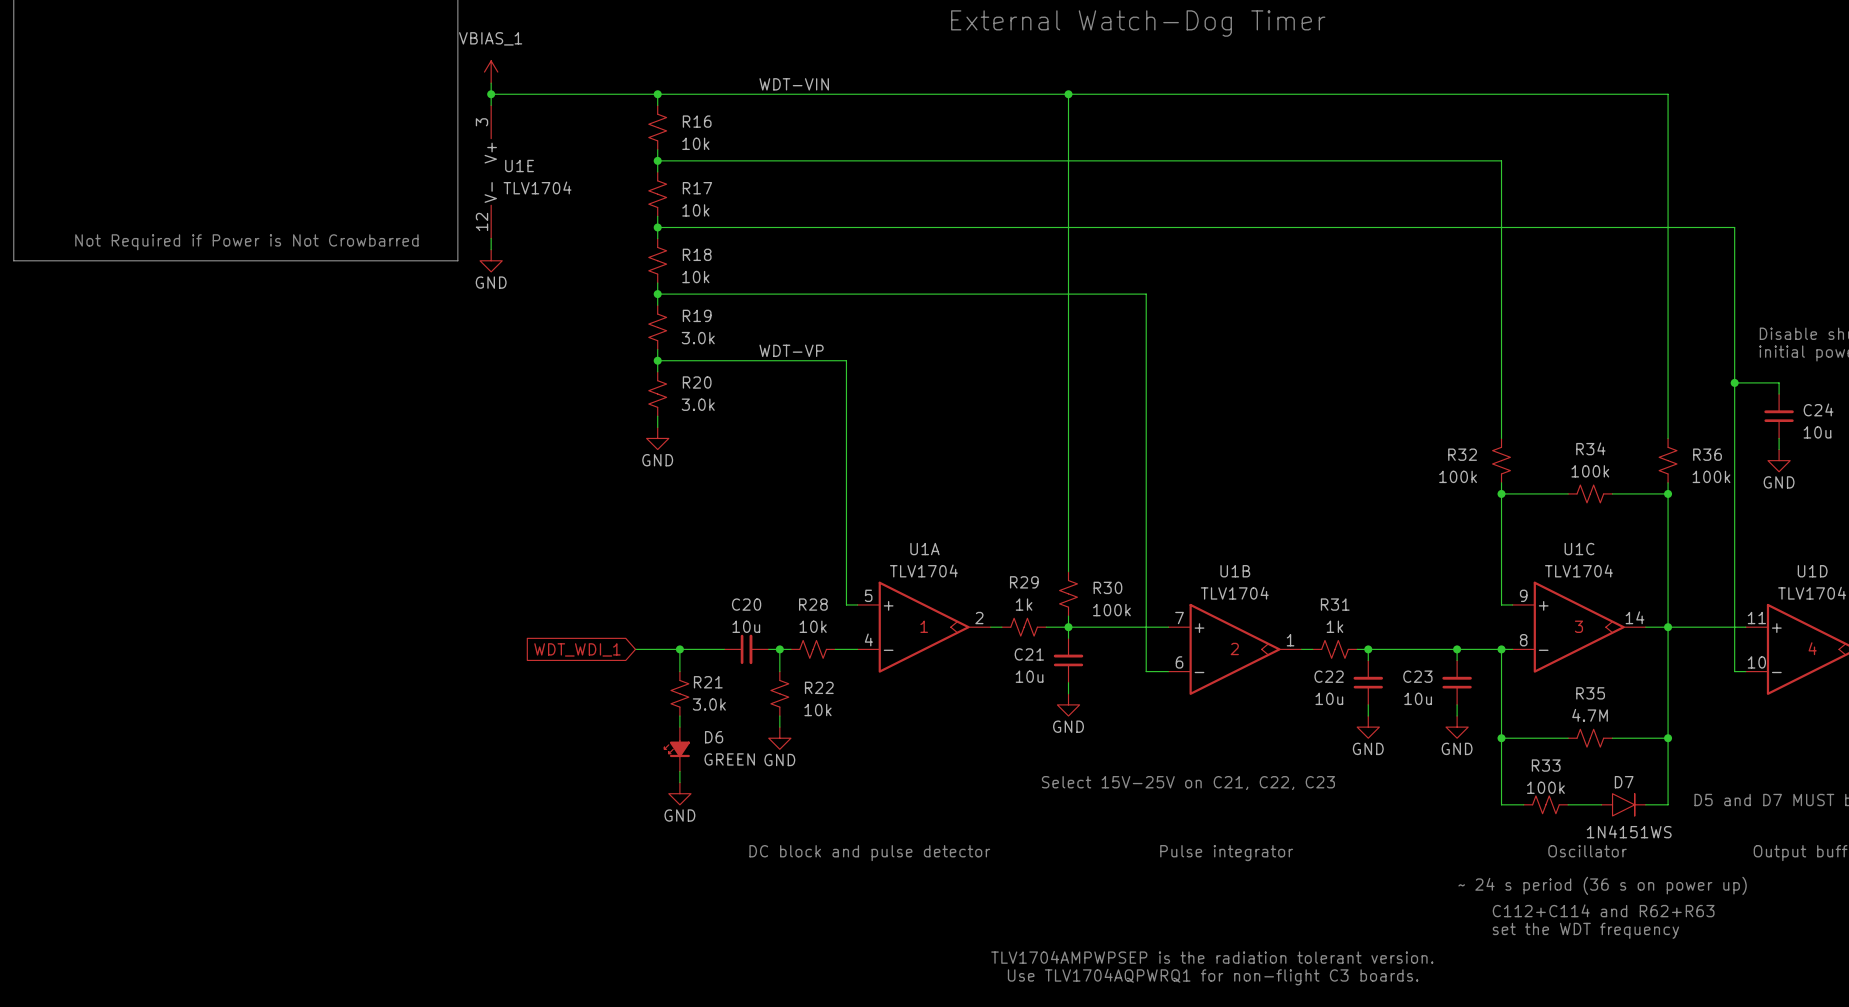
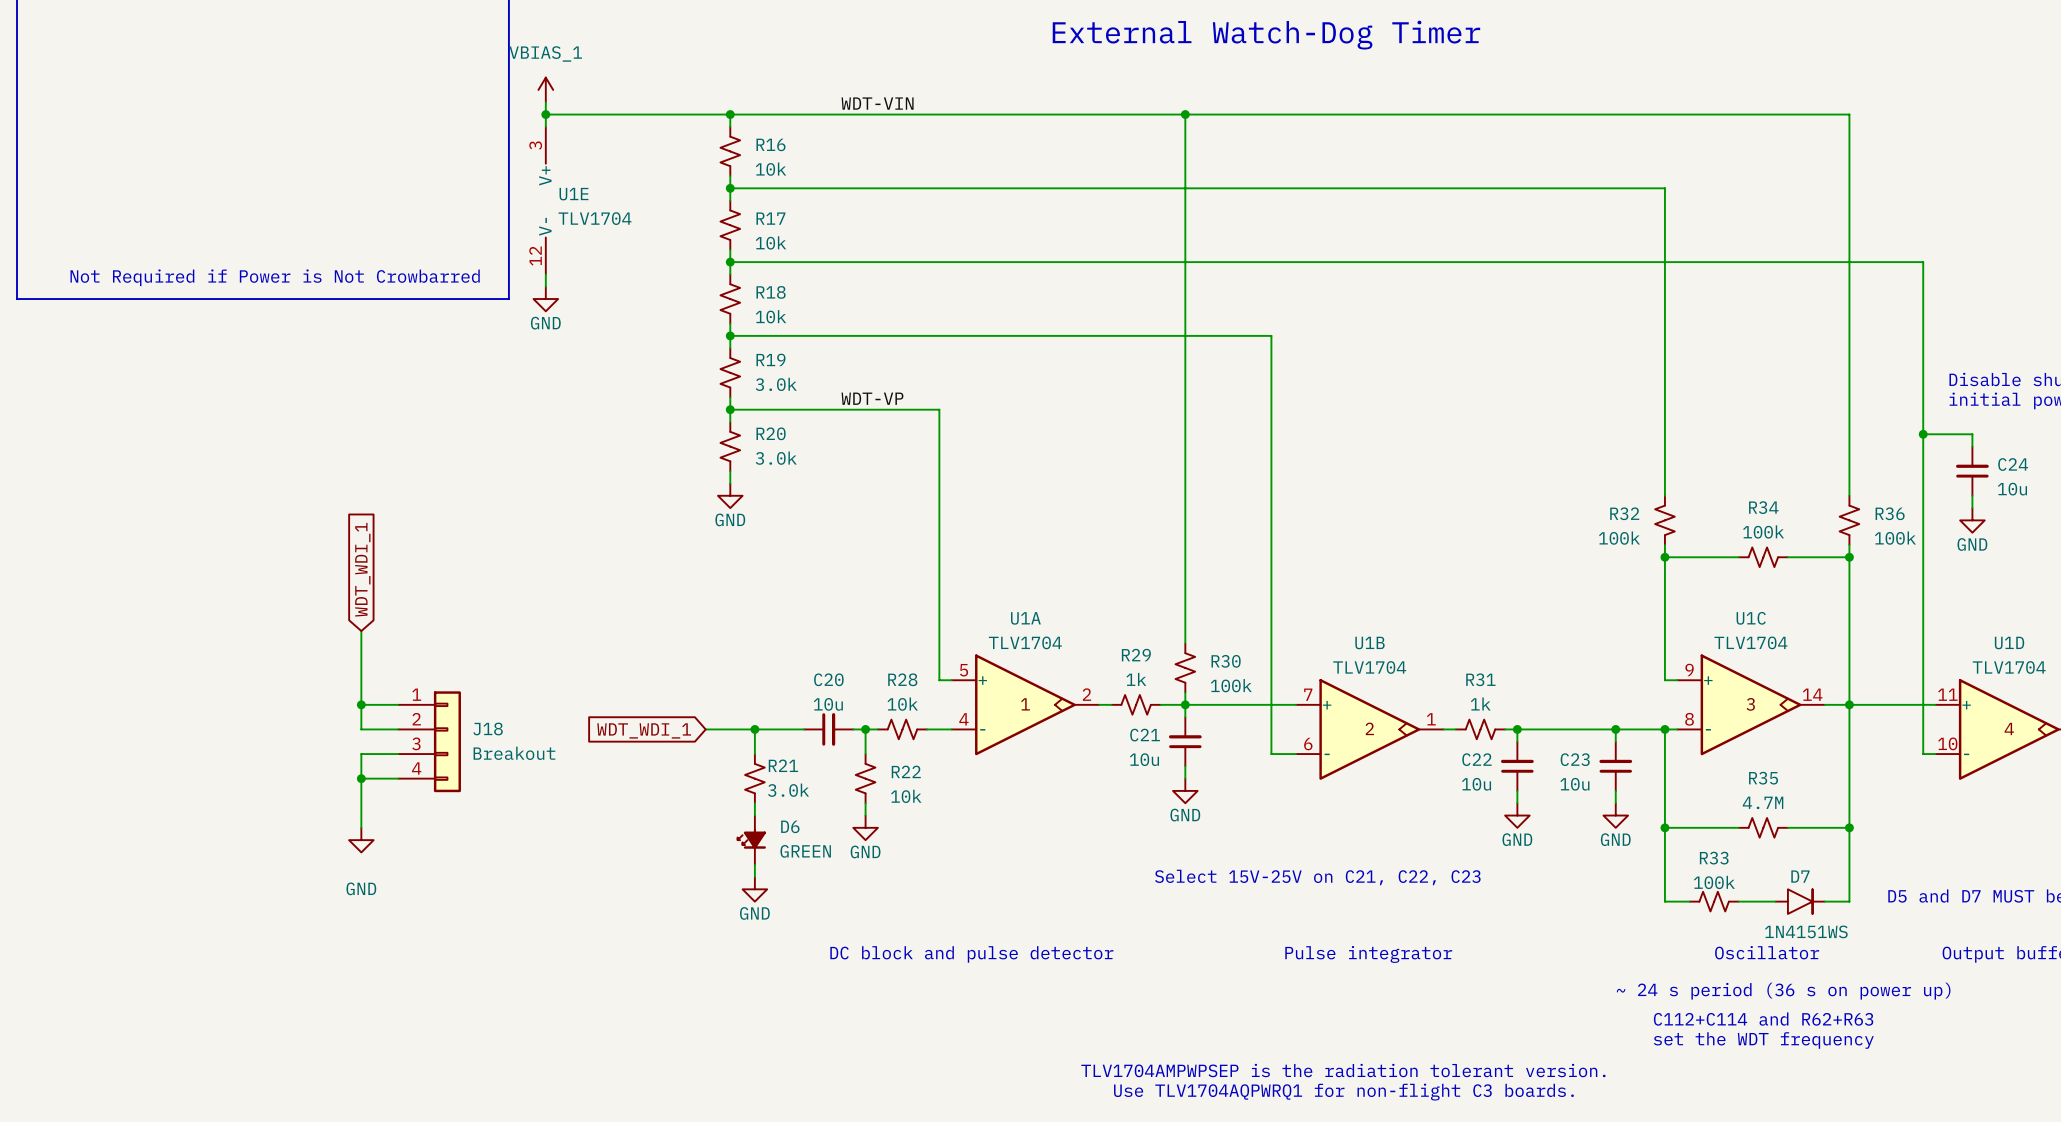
global label: none -> WDT_WDI_1 (362, 569)
wire: none -> (361, 631) (361, 729) (398, 729)
wire: none -> (361, 704) (398, 704)
junction: none -> (361, 704)
J18: none -> Breakout (429, 741)
wire: none -> (398, 754) (361, 754) (361, 827)
wire: none -> (361, 778) (398, 778)
junction: none -> (361, 778)
power symbol: none -> GND (361, 840)

